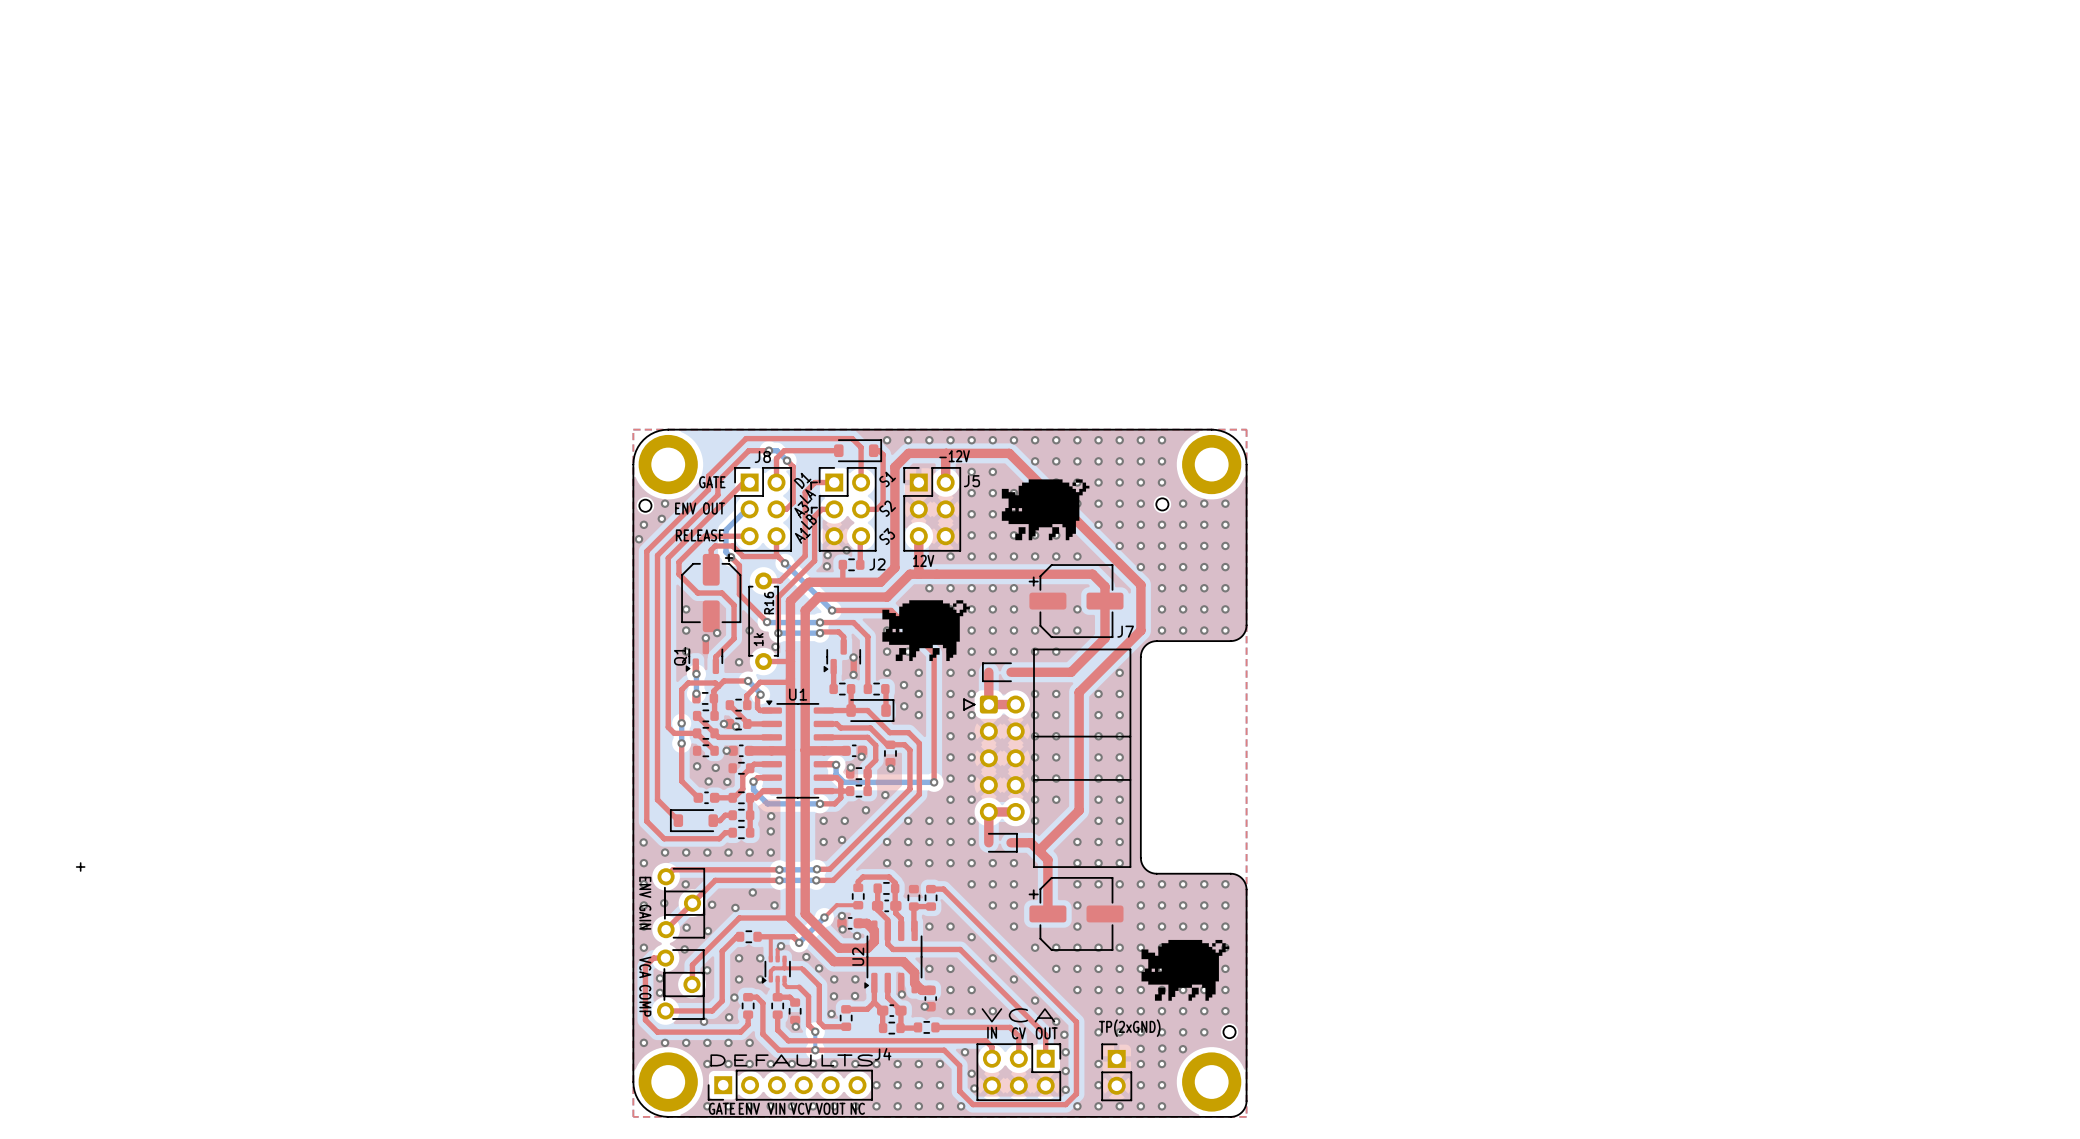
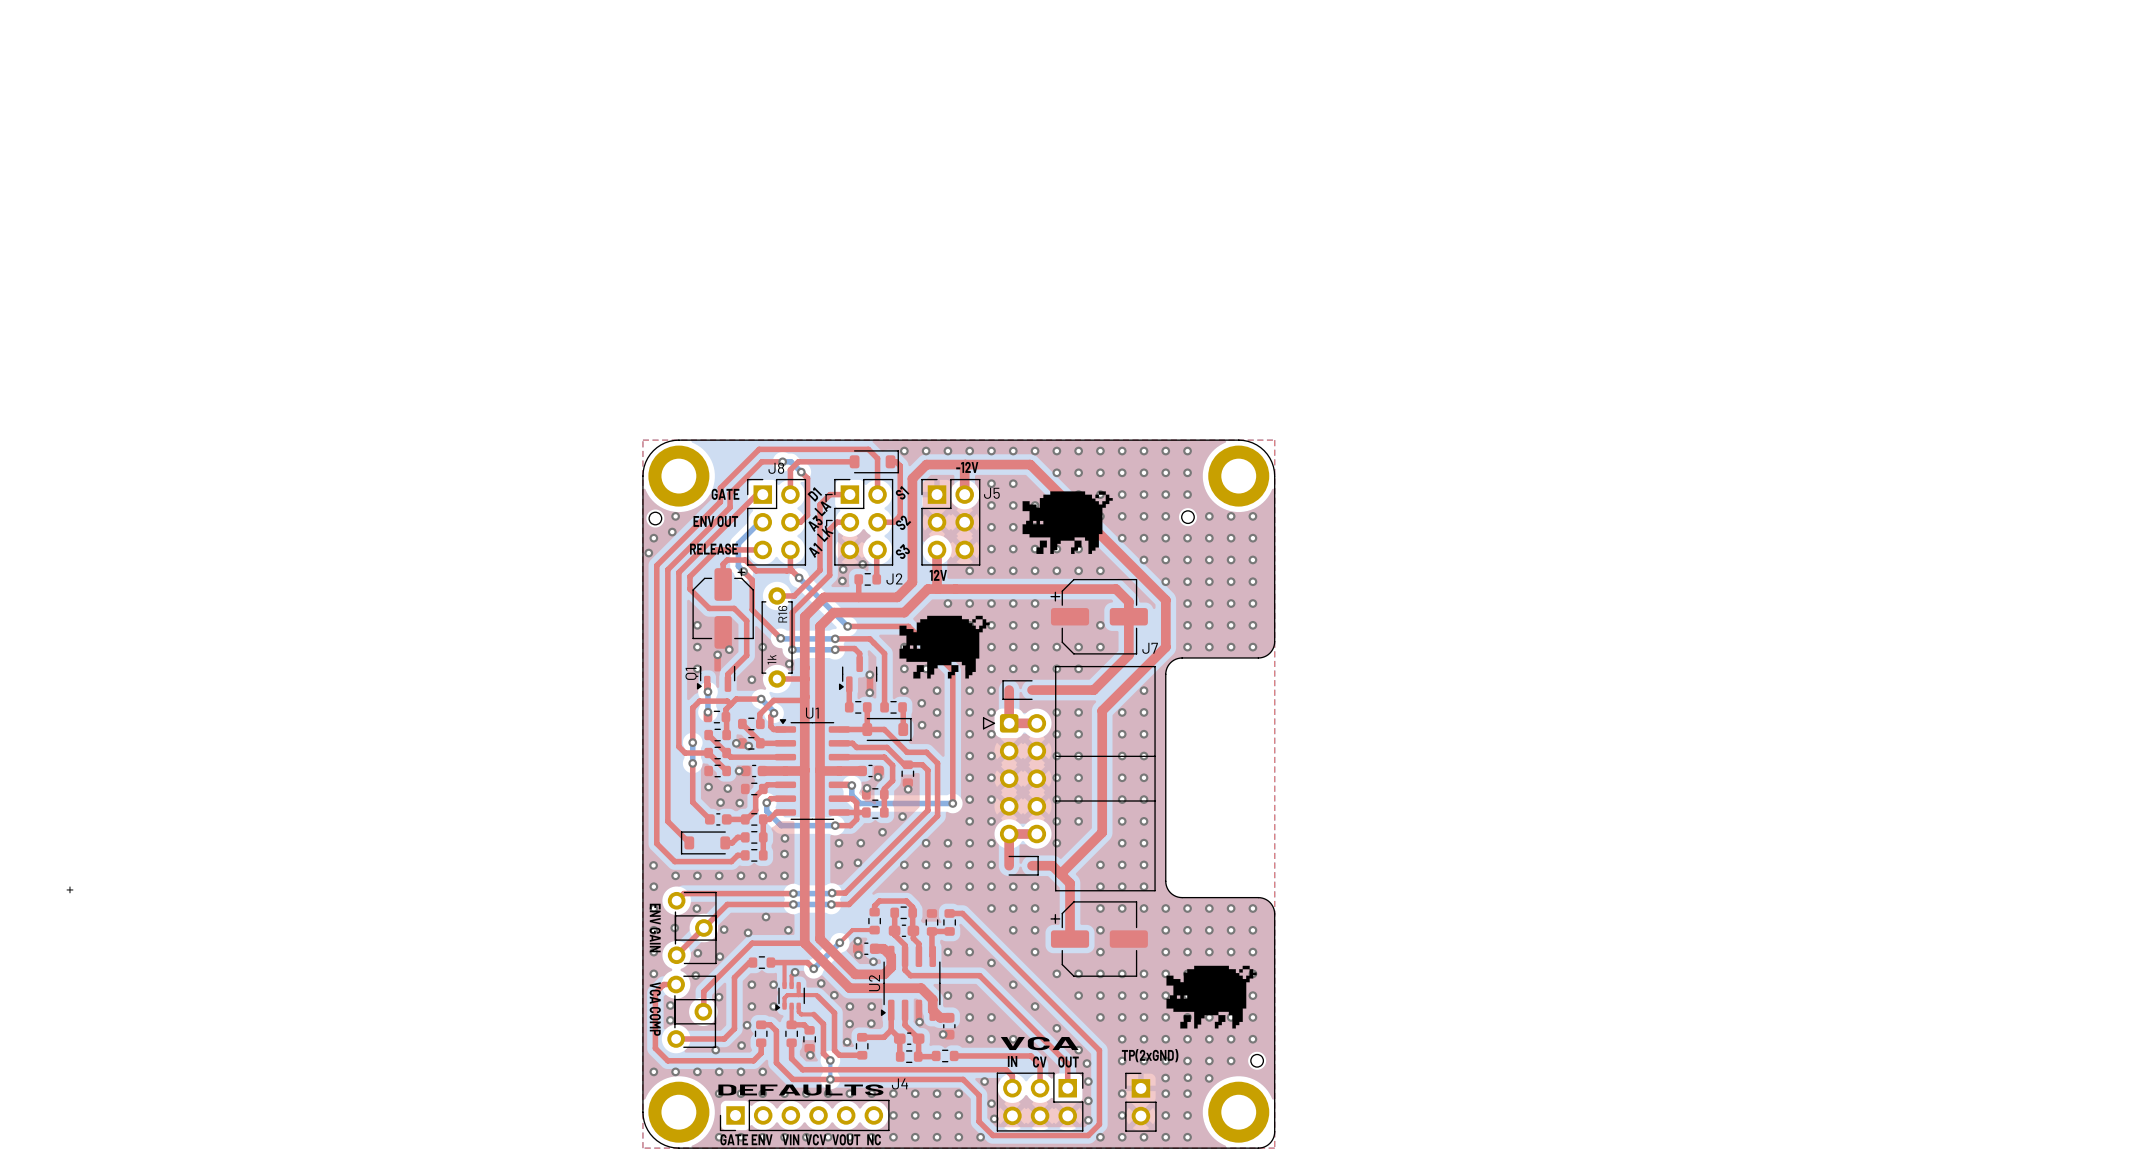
text: LB (808, 522) -> LK (825, 533)

